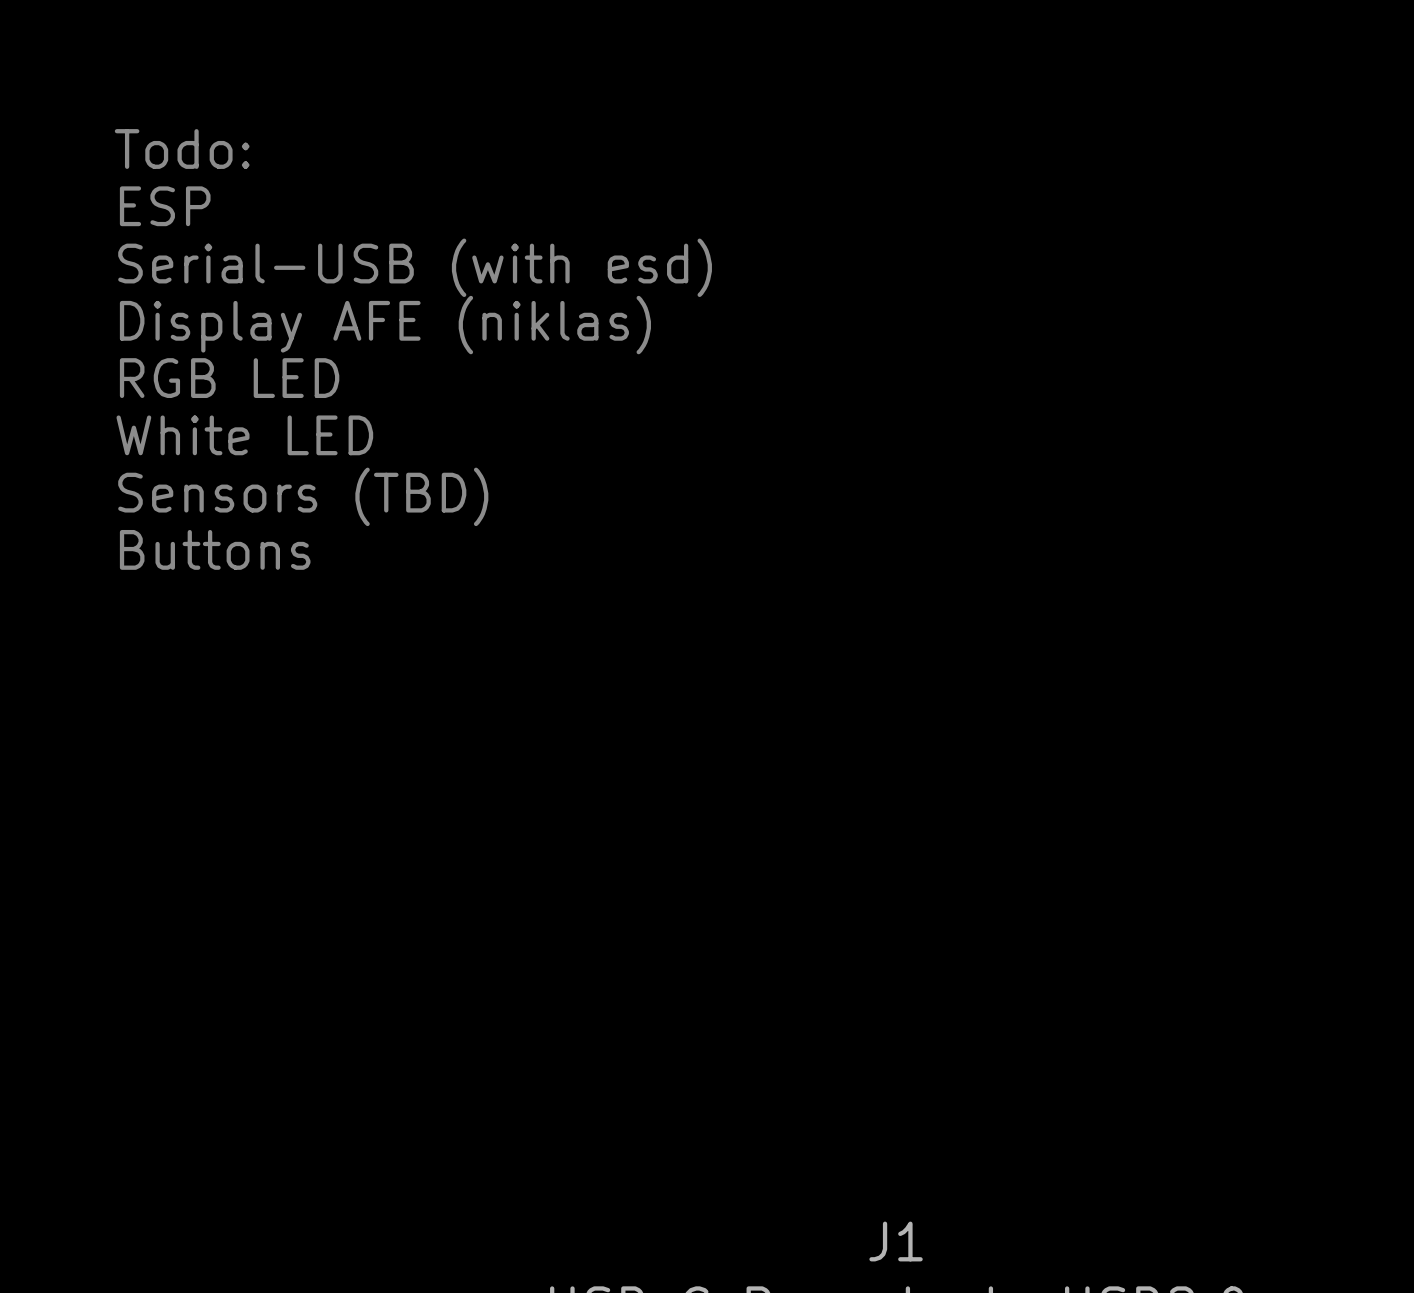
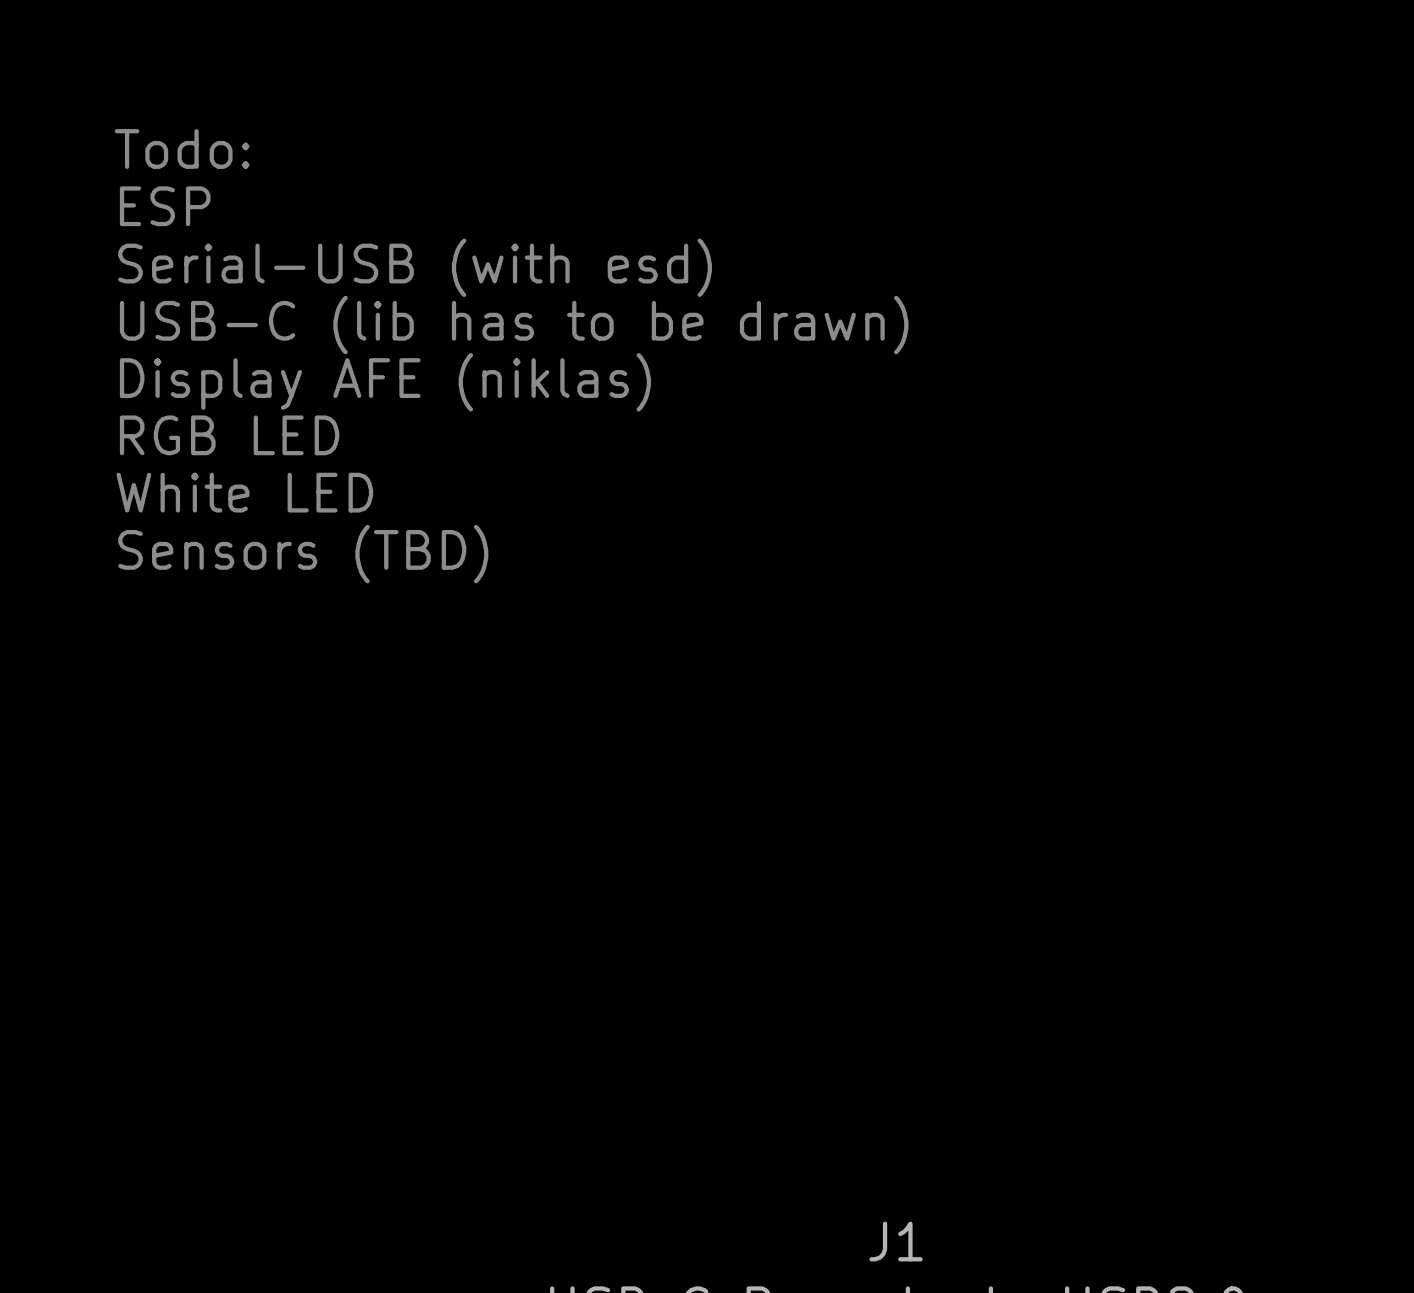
text: Display AFE (niklas) (385, 325) -> USB-C (lib has to be drawn) (514, 325)
text: RGB LED (229, 378) -> Display AFE (niklas) (385, 382)
text: White LED (244, 435) -> RGB LED (229, 435)
text: Sensors (TBD) (303, 496) -> White LED (244, 492)
text: Buttons (215, 549) -> Sensors (TBD) (303, 554)

